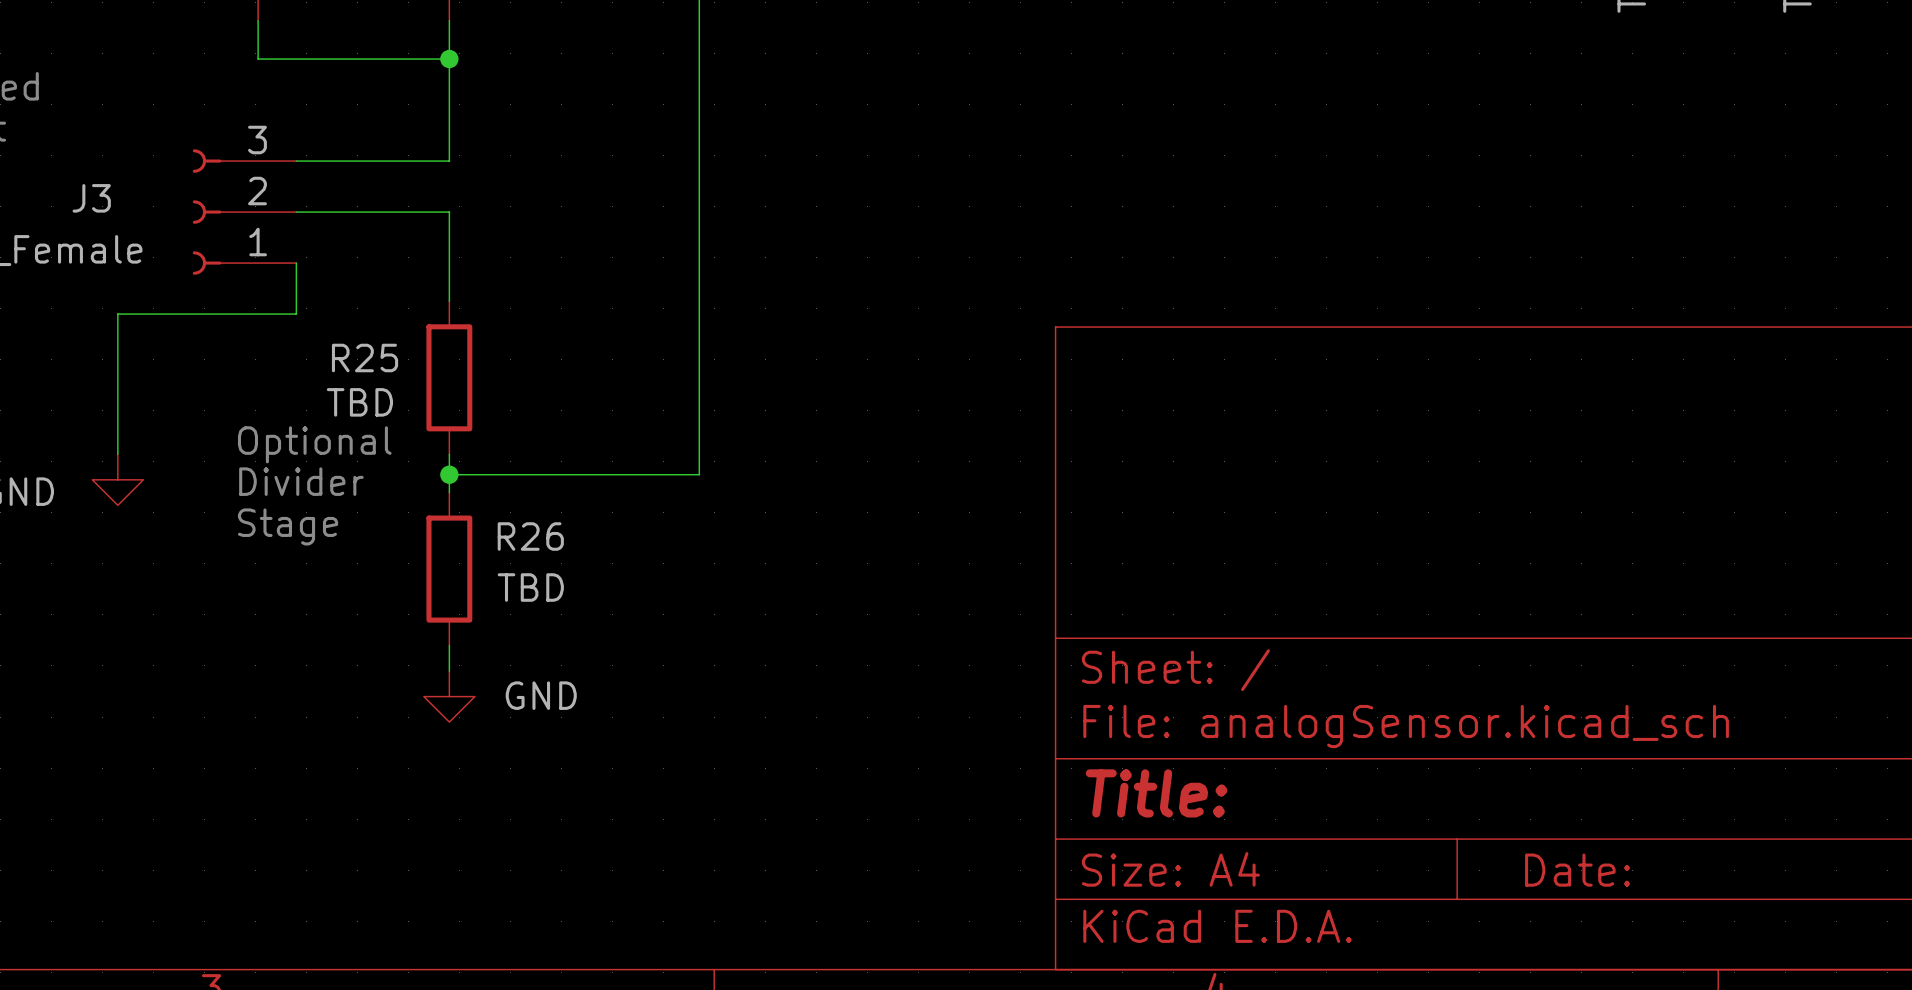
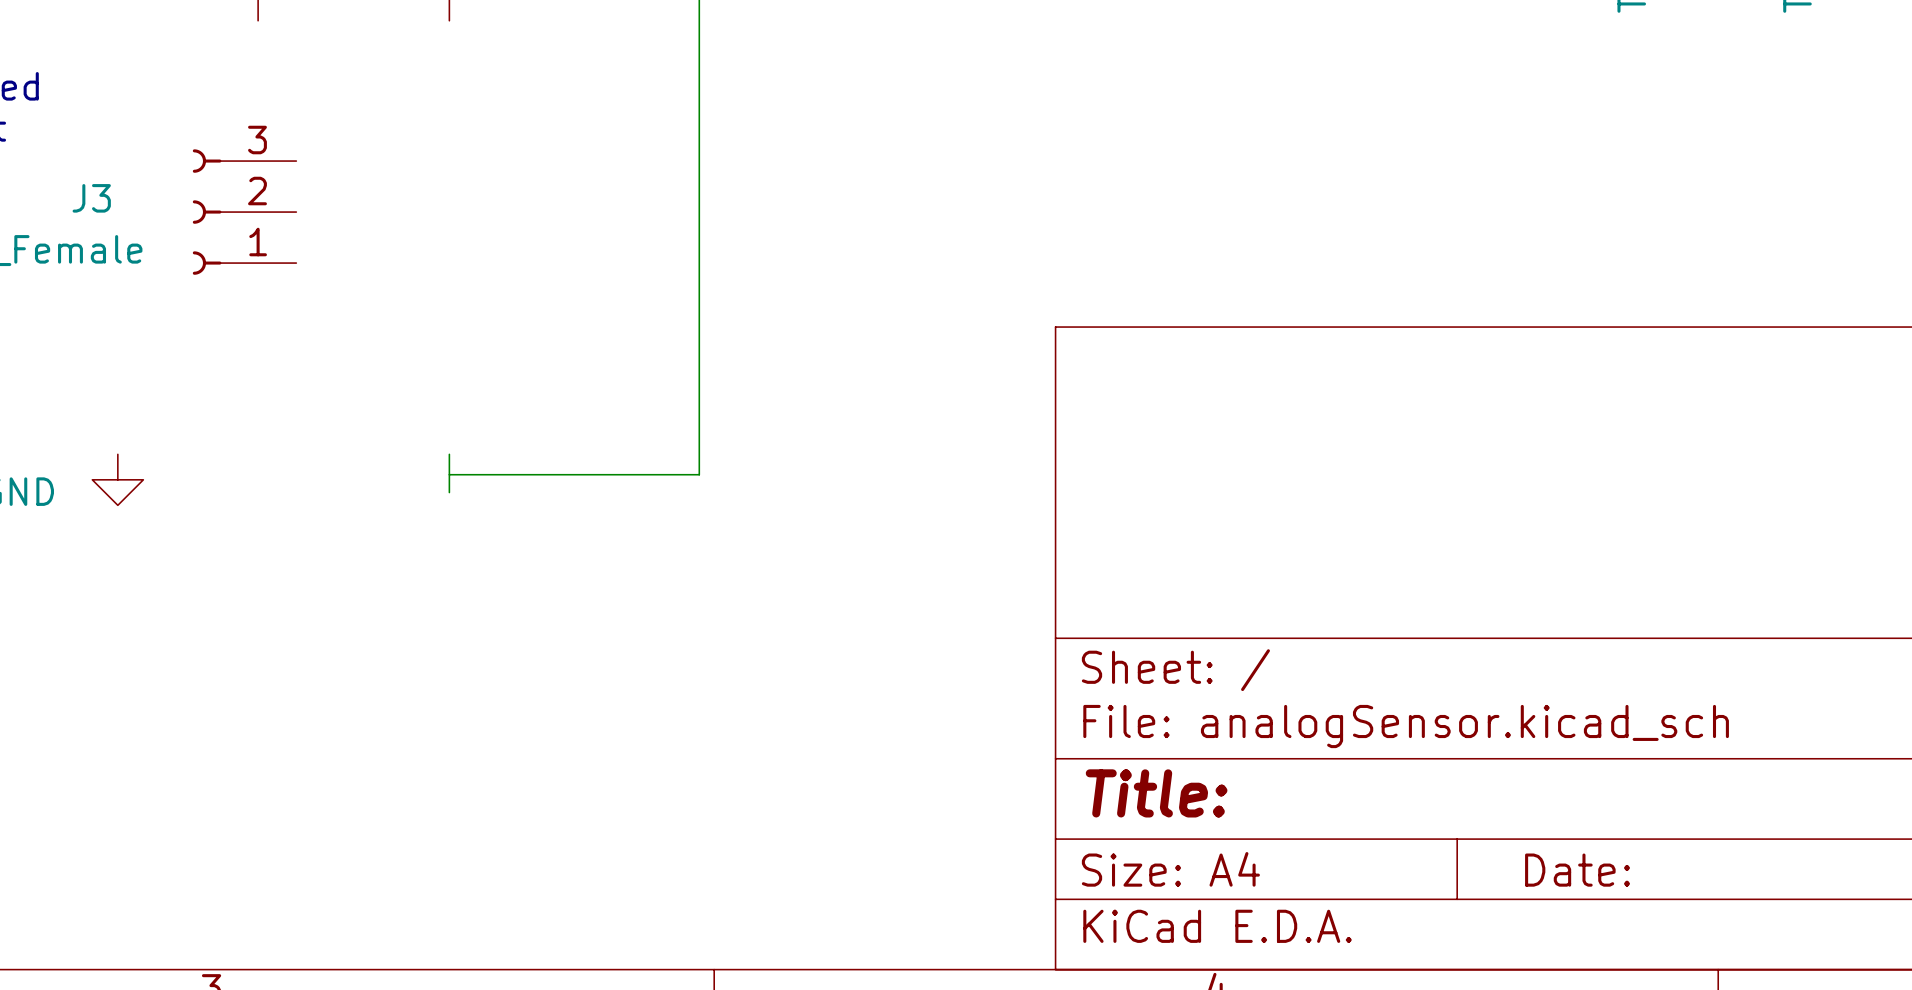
wire: (258, 20) (258, 59) (449, 59) -> none
wire: (449, 20) (449, 161) (296, 161) -> none
junction: (449, 59) -> none
wire: (296, 212) (449, 212) (449, 301) -> none
wire: (296, 263) (296, 314) (117, 314) (117, 454) -> none
R25: TBD (449, 377) -> none
text: Optional (314, 444) -> none
junction: (449, 474) -> none
text: Divider (301, 481) -> none
text: Stage (288, 526) -> none
R26: TBD (449, 569) -> none
wire: (449, 645) (449, 671) -> none
power symbol: GND (449, 696) -> none

